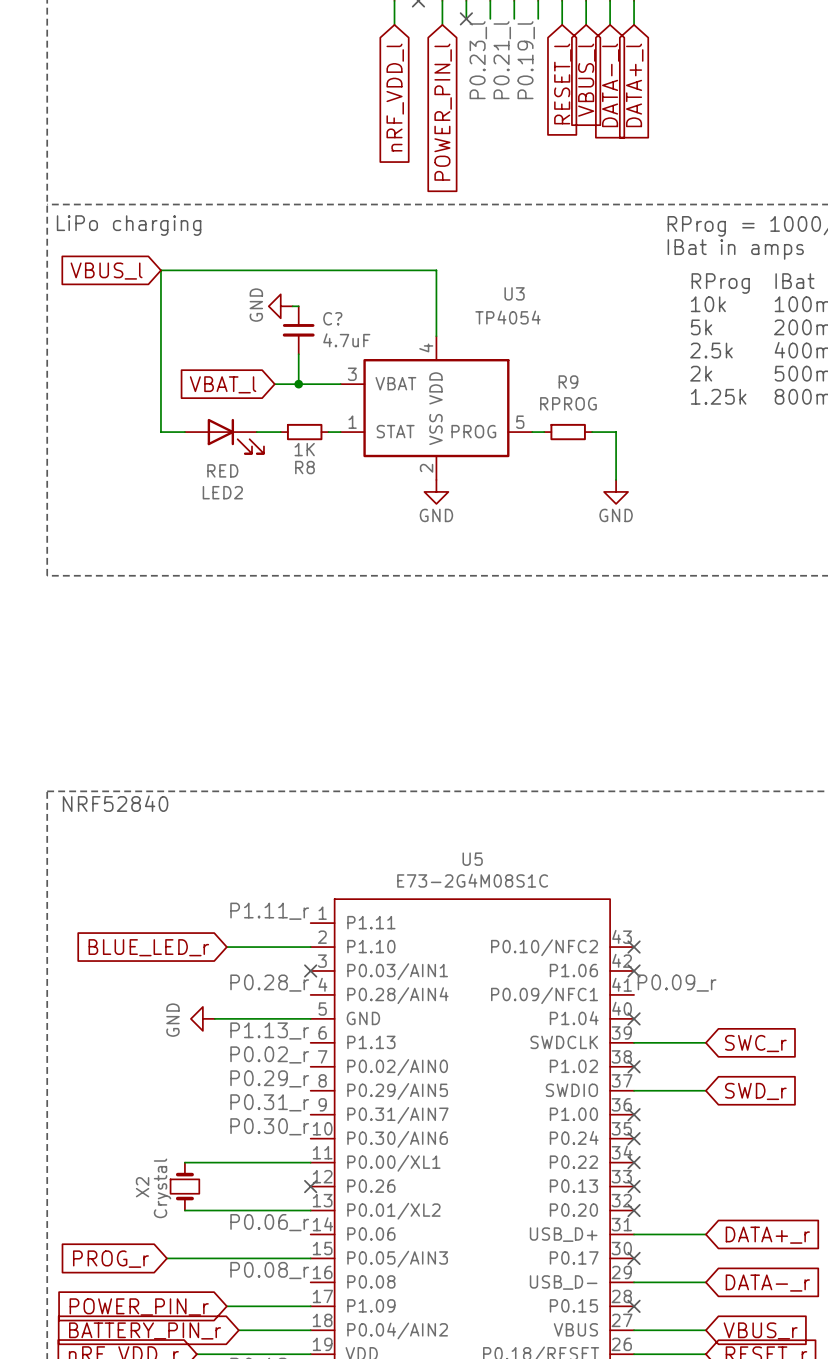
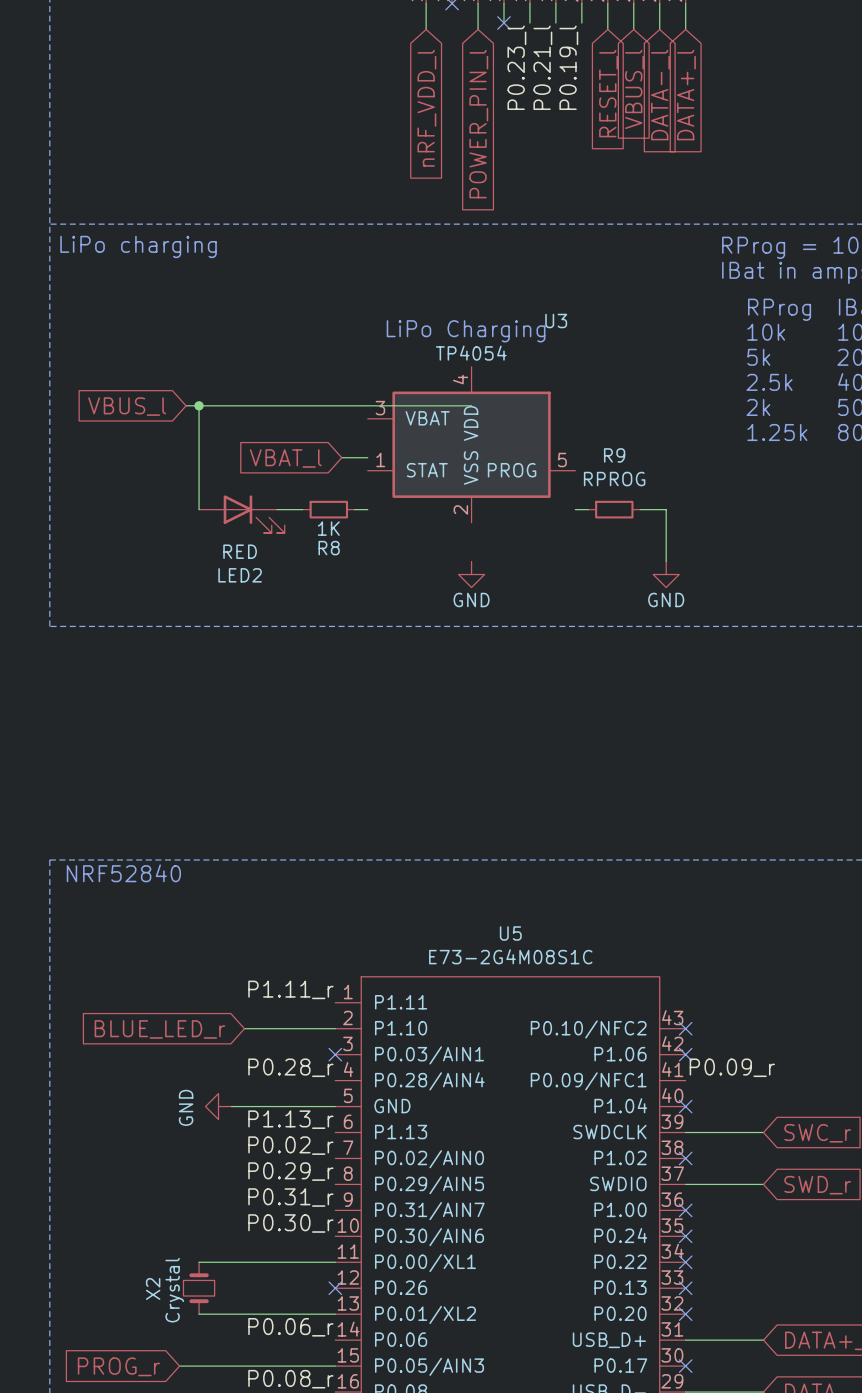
global label position: VBUS_l (106, 271) -> VBUS_l (127, 406)
text: none -> LiPo Charging (466, 331)
power symbol: GND (280, 306) -> none
wire: (292, 306) (298, 306) -> none
U3 value position: TP4054 (508, 317) -> TP4054 (471, 353)
C?: 4.7uF (298, 330) -> none
wire: (436, 336) (436, 270) (160, 270) (160, 432) (184, 432) -> none
wire: (298, 354) (298, 384) -> none
wire: none -> (186, 405) (471, 405)
wire: none -> (199, 405) (199, 509)
junction: none -> (199, 405)
global label position: VBAT_l (223, 384) -> VBAT_l (285, 458)
wire: (274, 384) (340, 384) -> none
junction: (298, 384) -> none
wire: none -> (341, 457) (367, 457)
wire: (256, 432) (280, 432) -> (276, 509) (302, 509)
R8 position: (304, 432) -> (328, 509)
wire: (328, 432) (340, 432) -> (354, 509) (367, 509)
wire: (532, 432) (544, 432) -> (575, 509) (588, 509)
R9 position: (568, 432) -> (614, 509)
wire: (592, 432) (616, 432) (616, 467) -> (640, 509) (666, 509)
LED2 position: (224, 436) -> (241, 514)
wire: none -> (666, 522) (666, 561)
power symbol position: GND (436, 491) -> GND (471, 574)
power symbol position: GND (616, 491) -> GND (666, 574)

